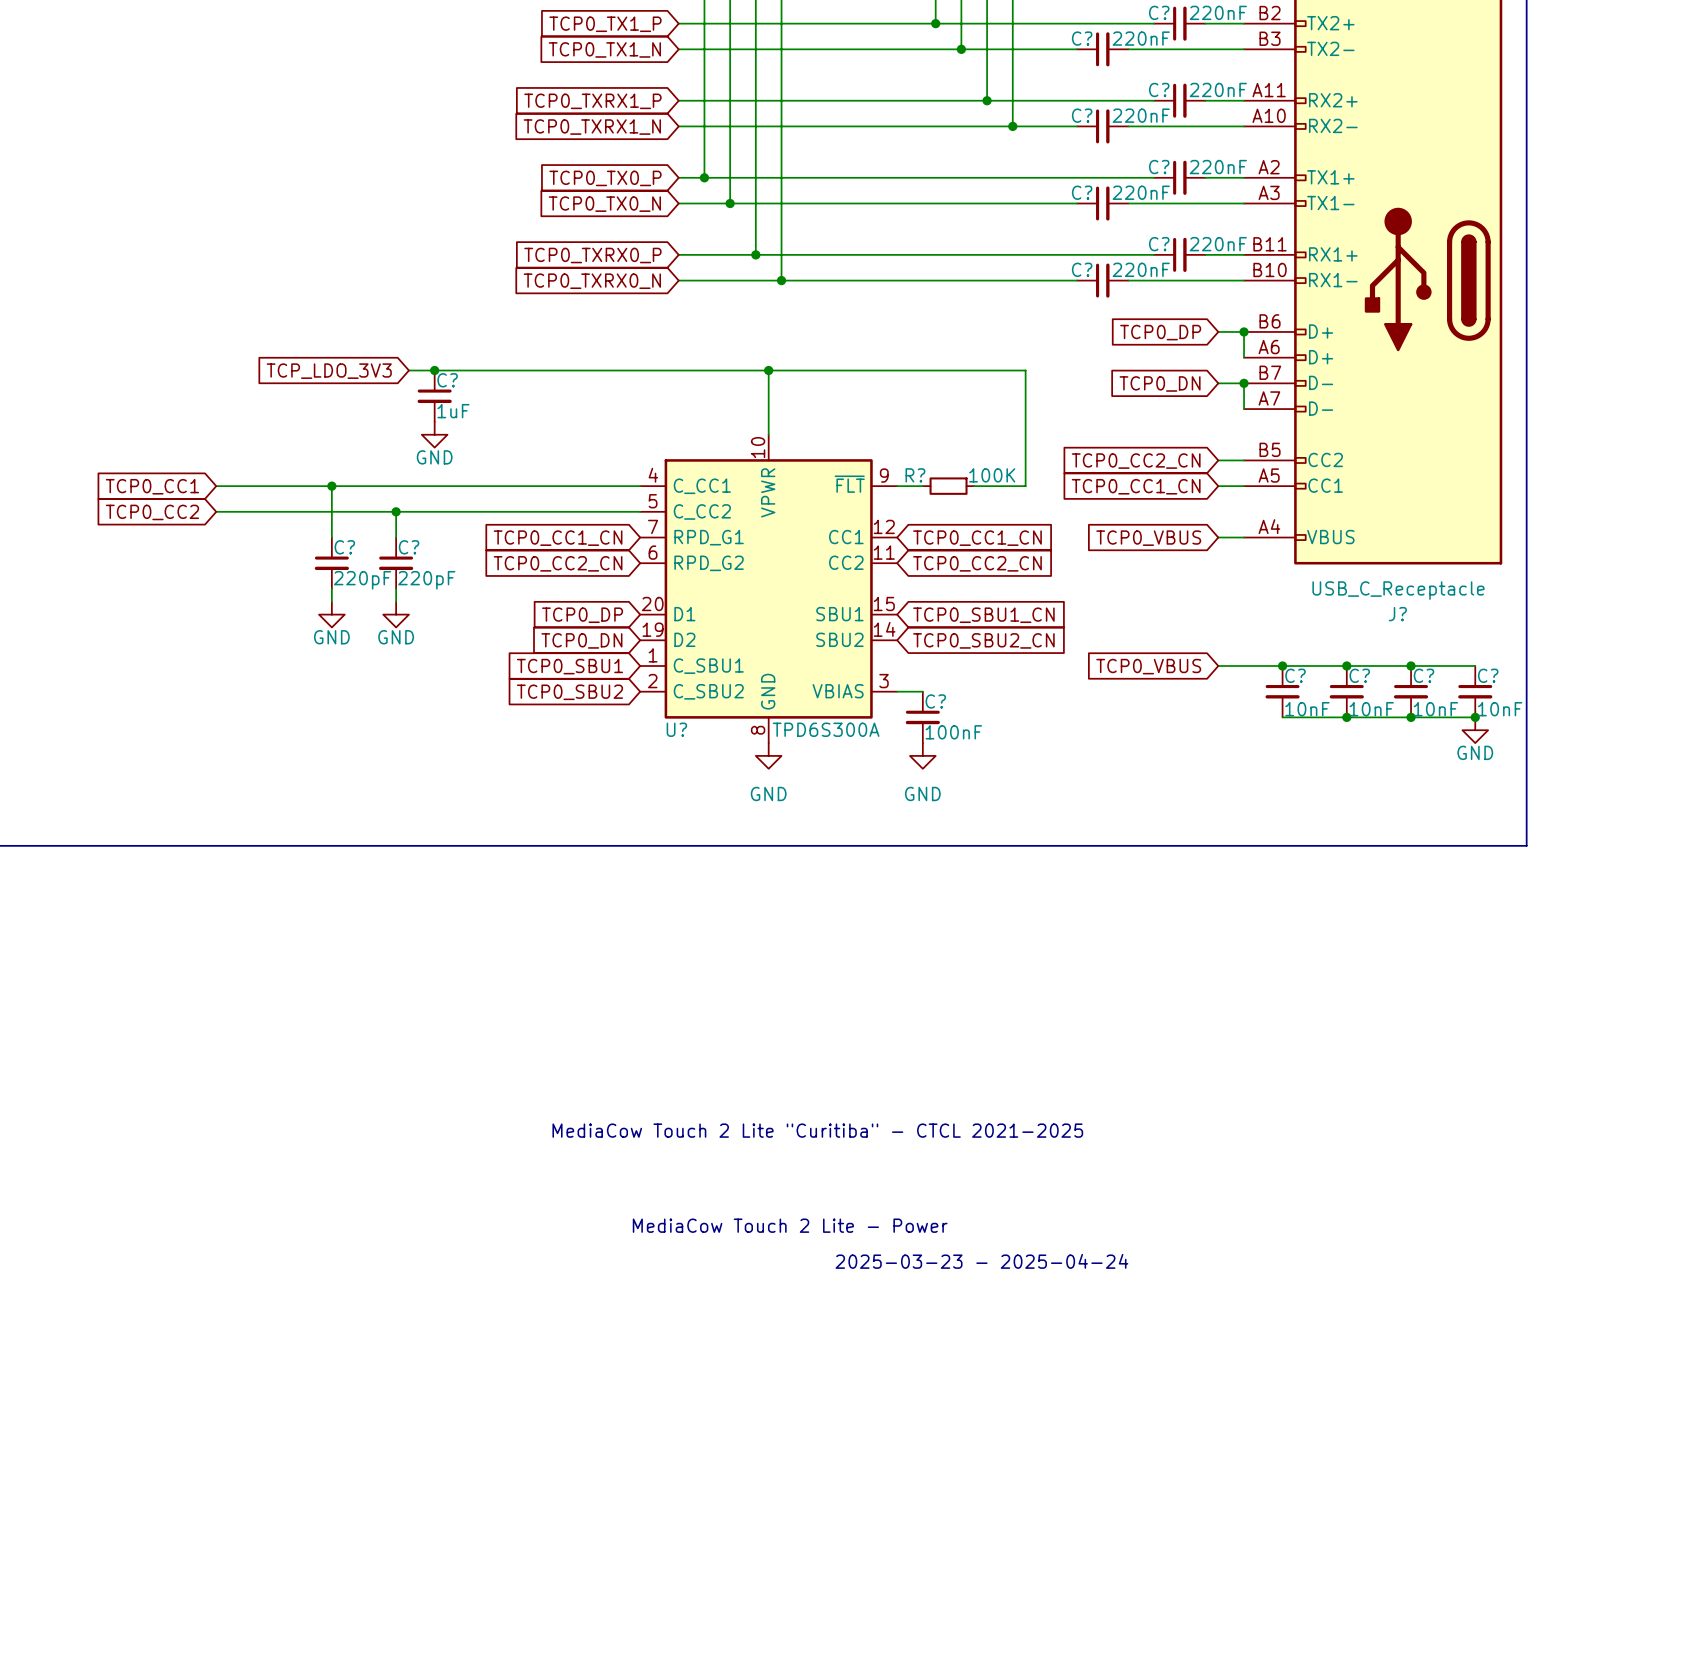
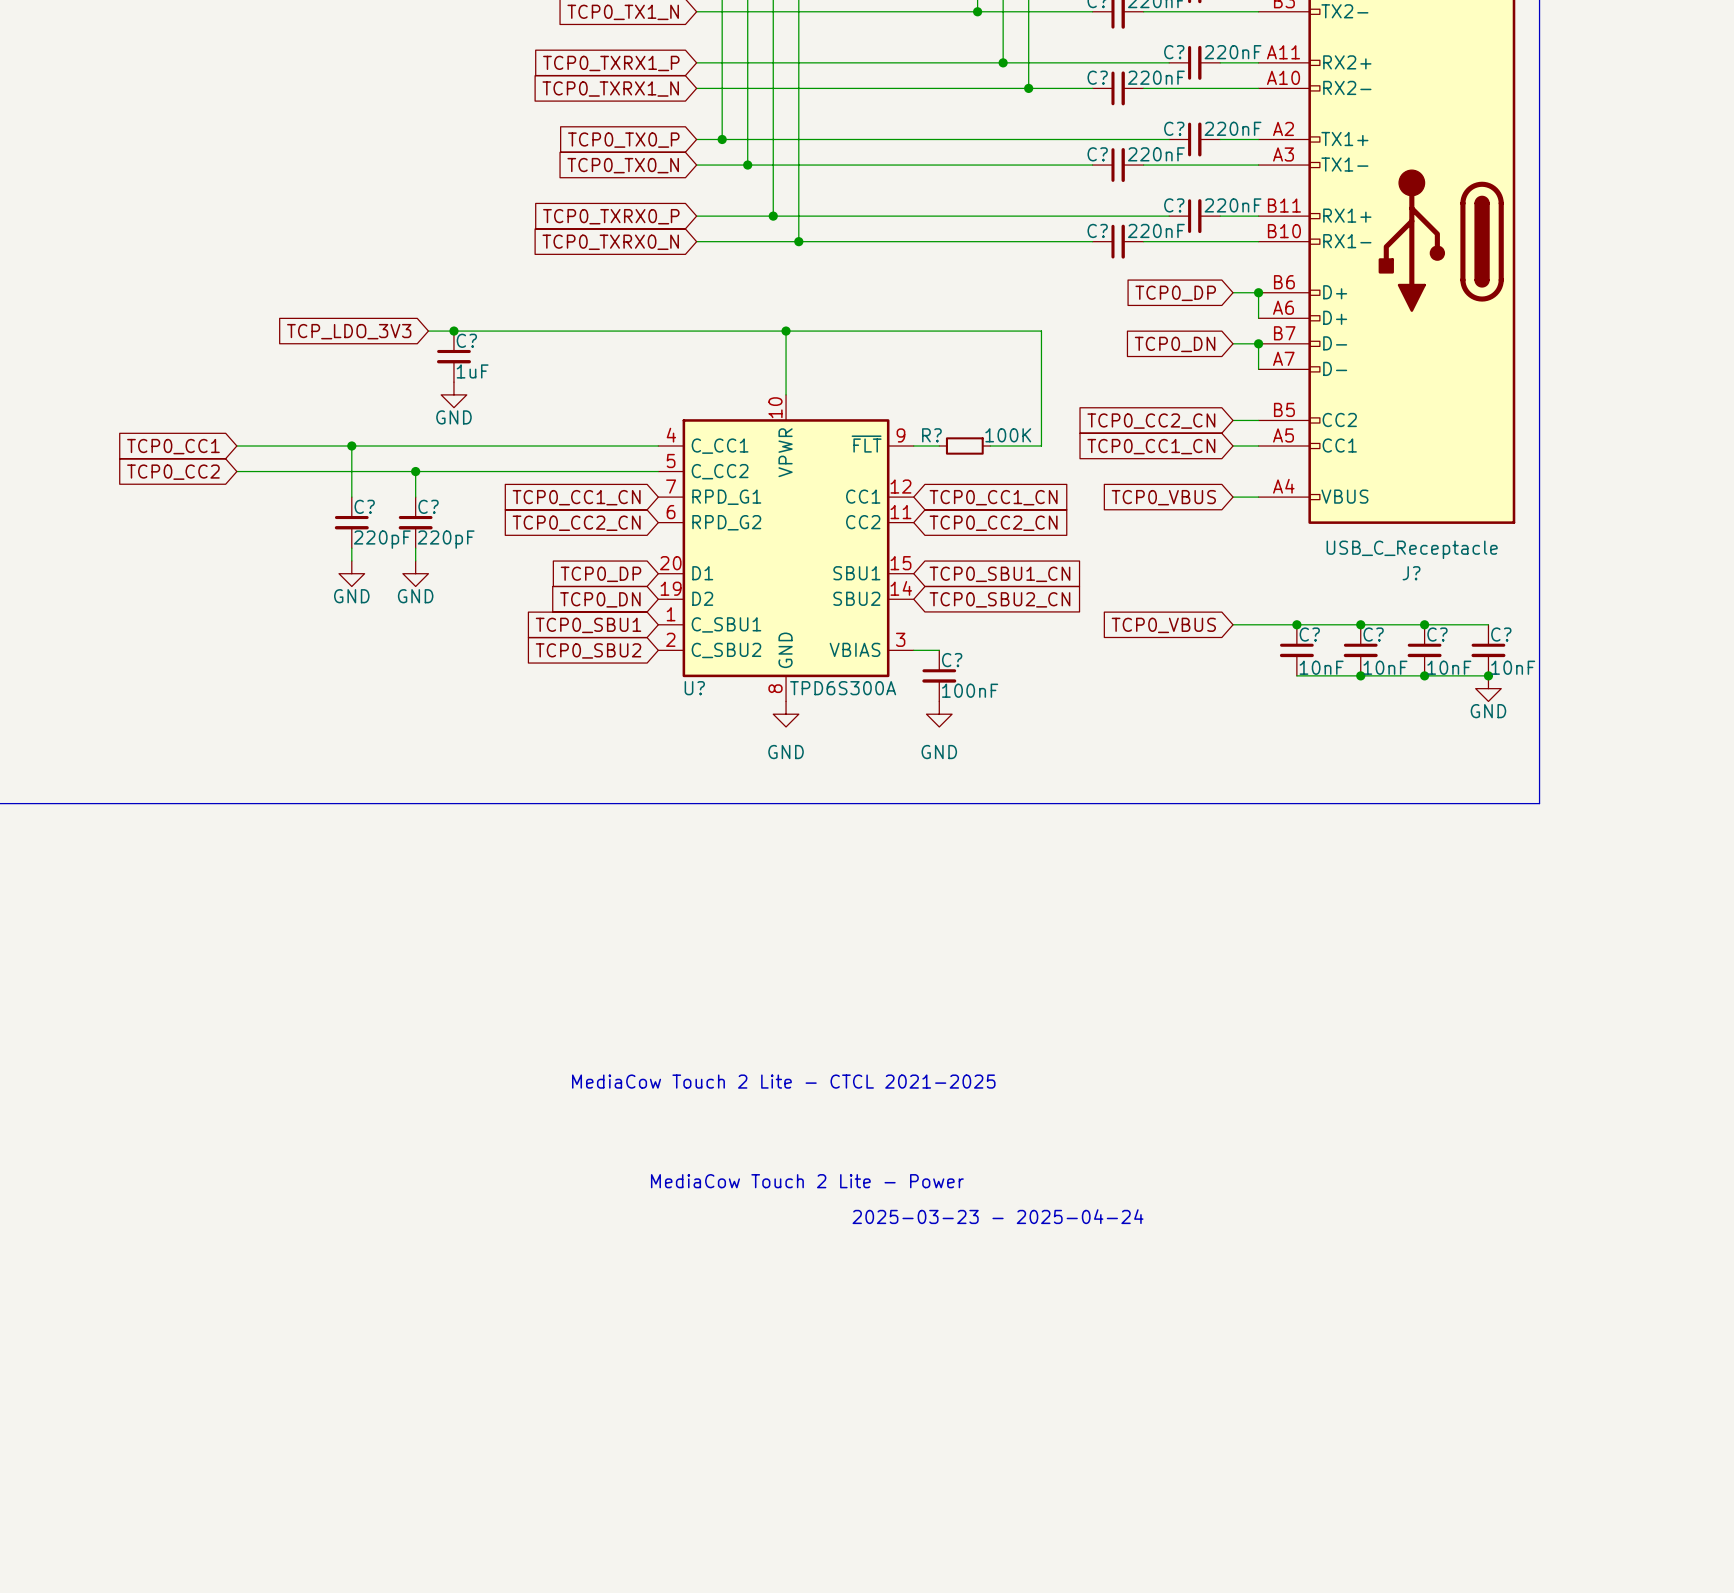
text: MediaCow Touch 2 Lite "Curitiba" - CTCL 2021-2025 (817, 1130) -> MediaCow Touch 2 Lite - CTCL 2021-2025 (783, 1081)

